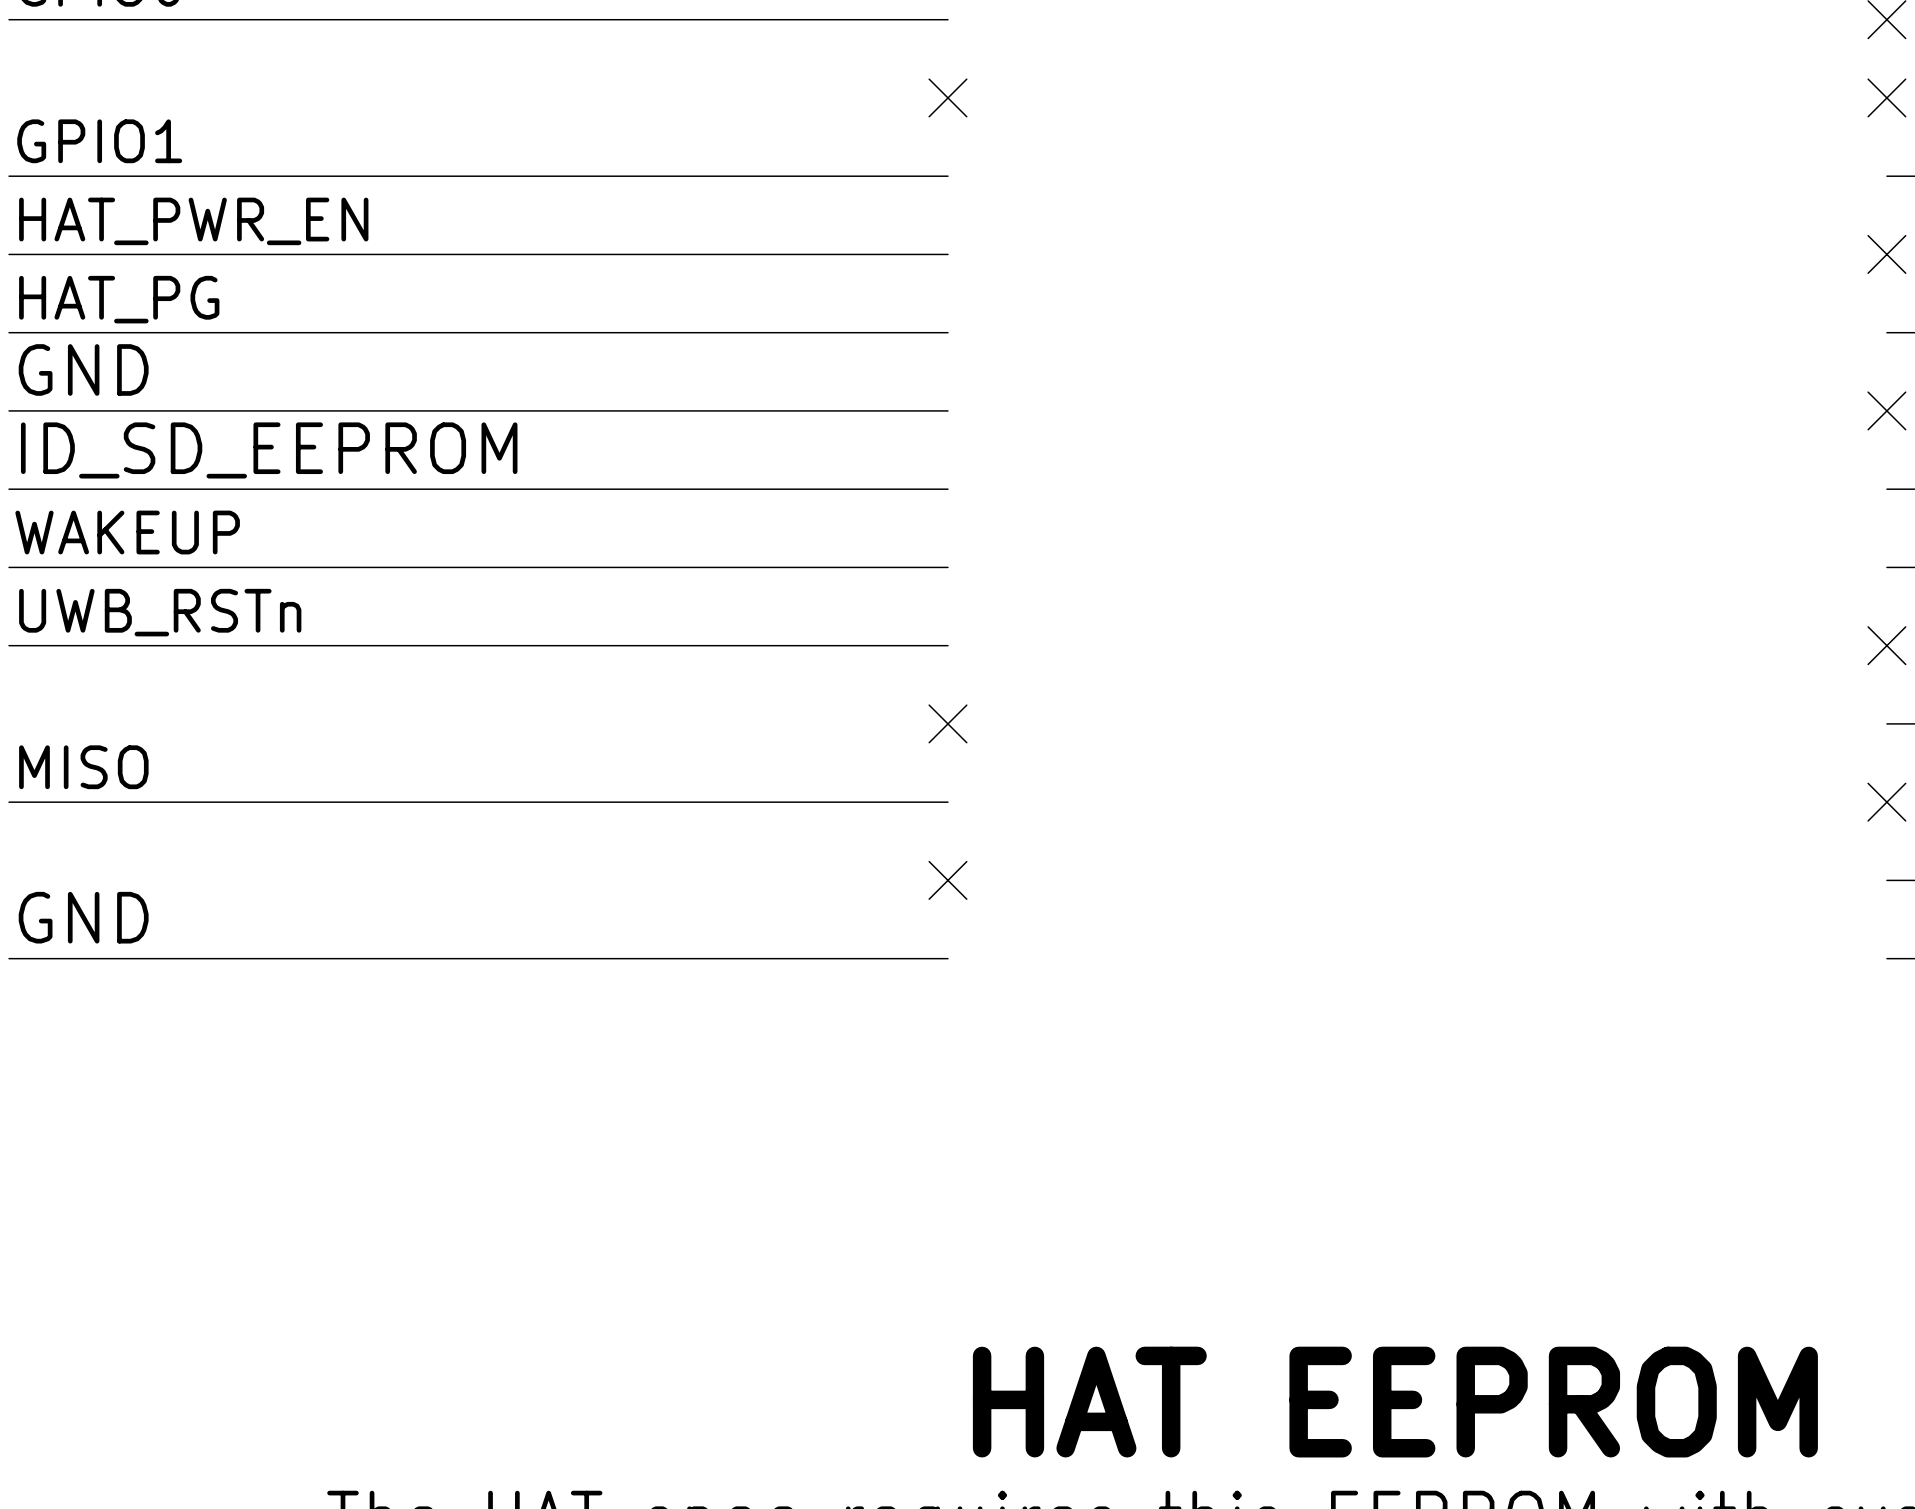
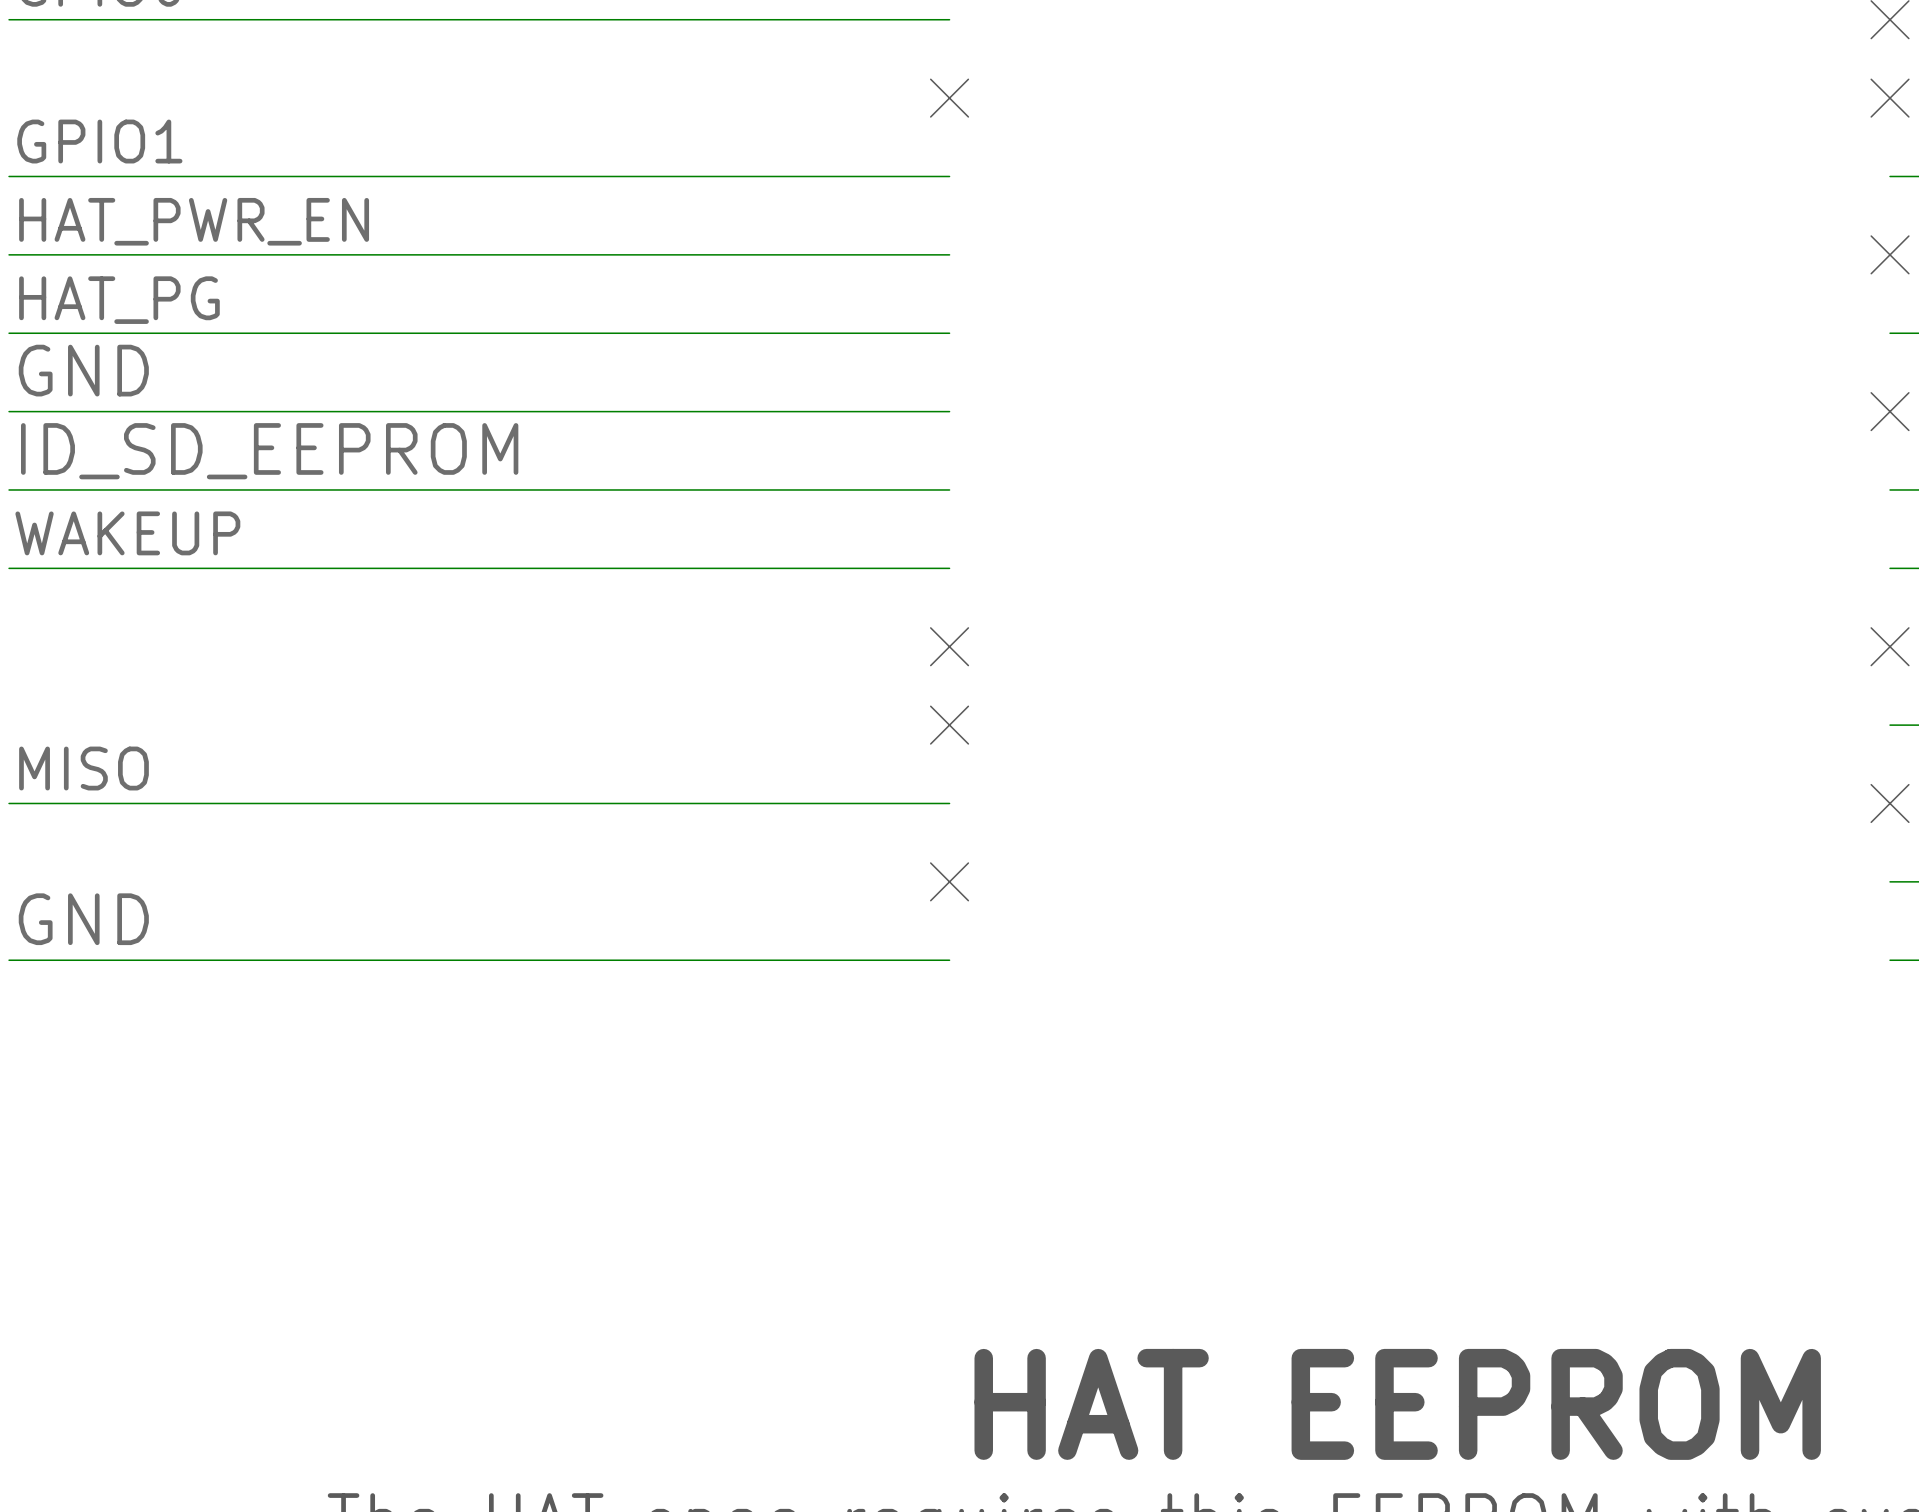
label: UWB_RSTn (160, 612) -> none
wire: (9, 645) (947, 645) -> none
no-connect mark: none -> (949, 646)

